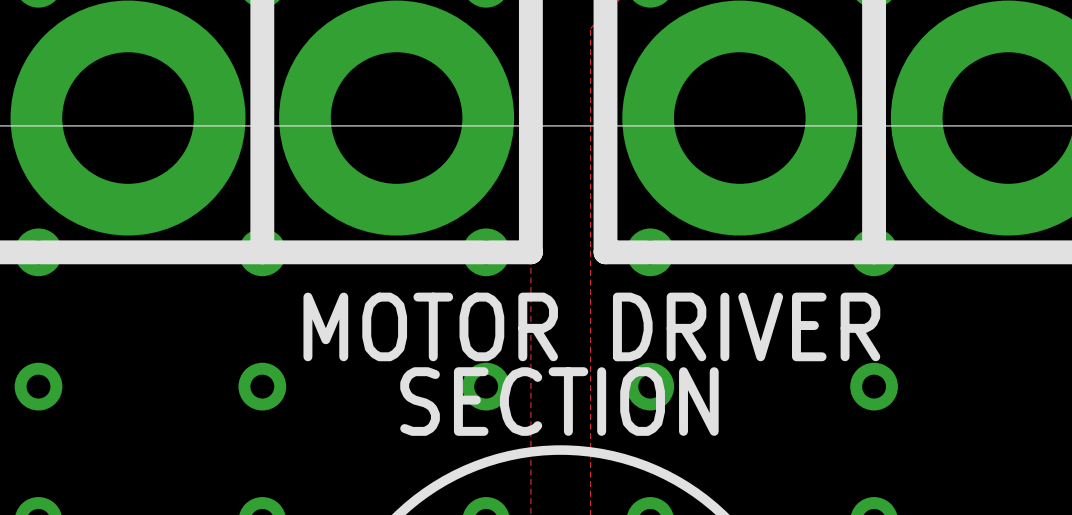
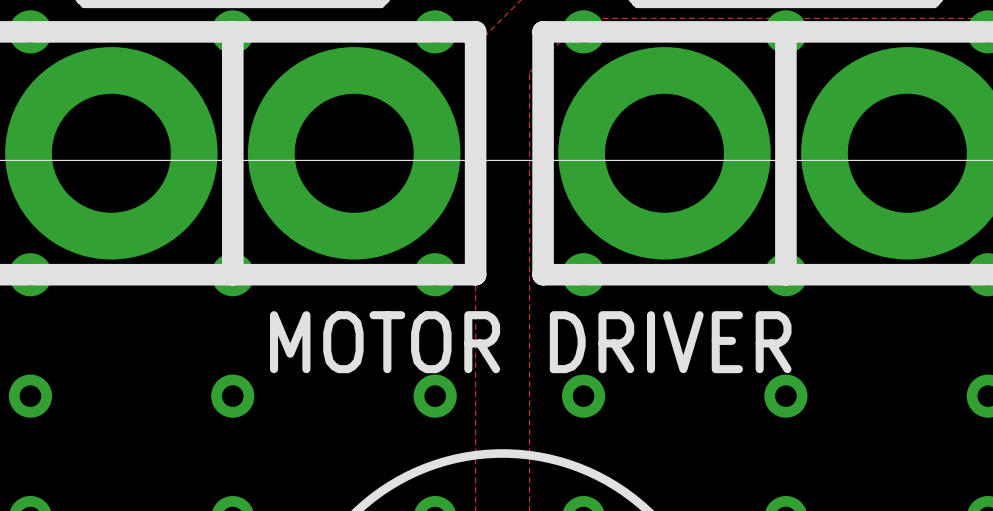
text: SECTION (559, 401) -> none

